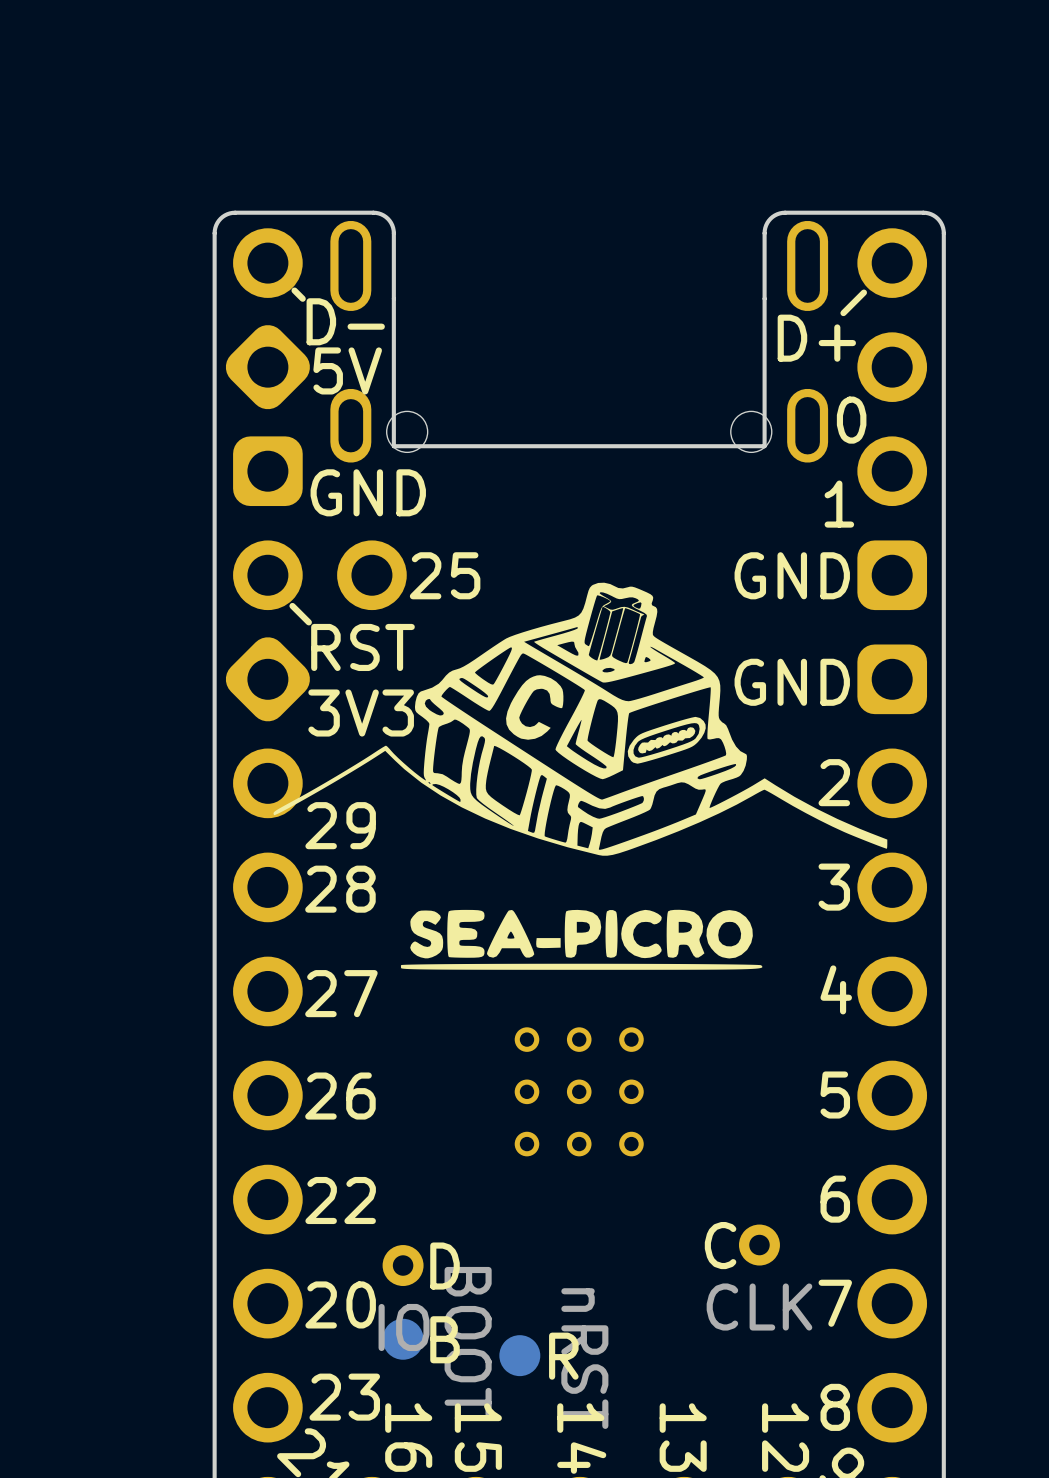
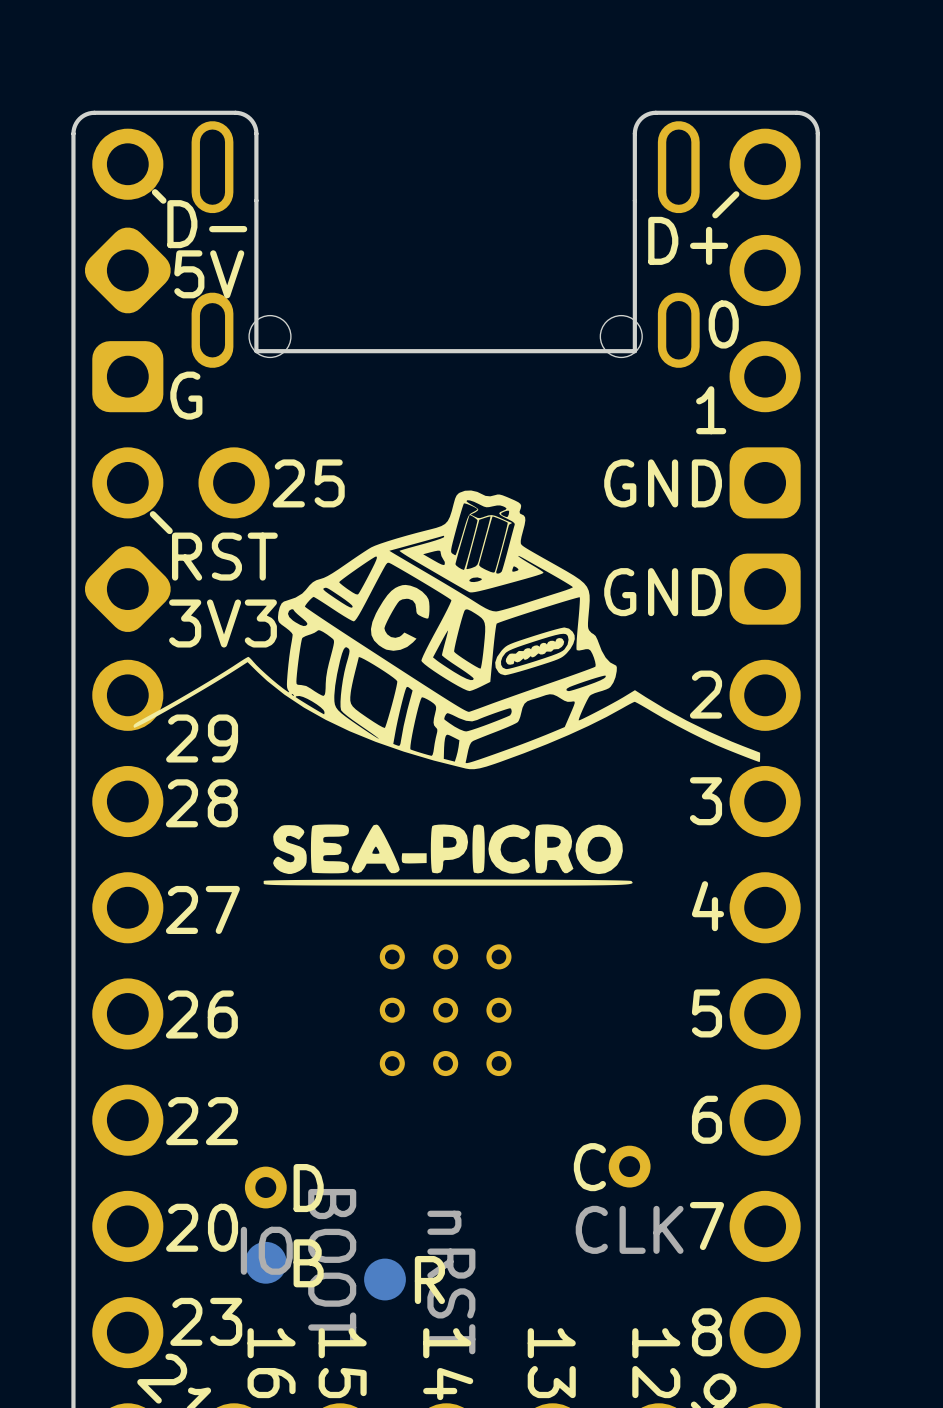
text: none -> G (186, 395)
text: GND (368, 492) -> none

